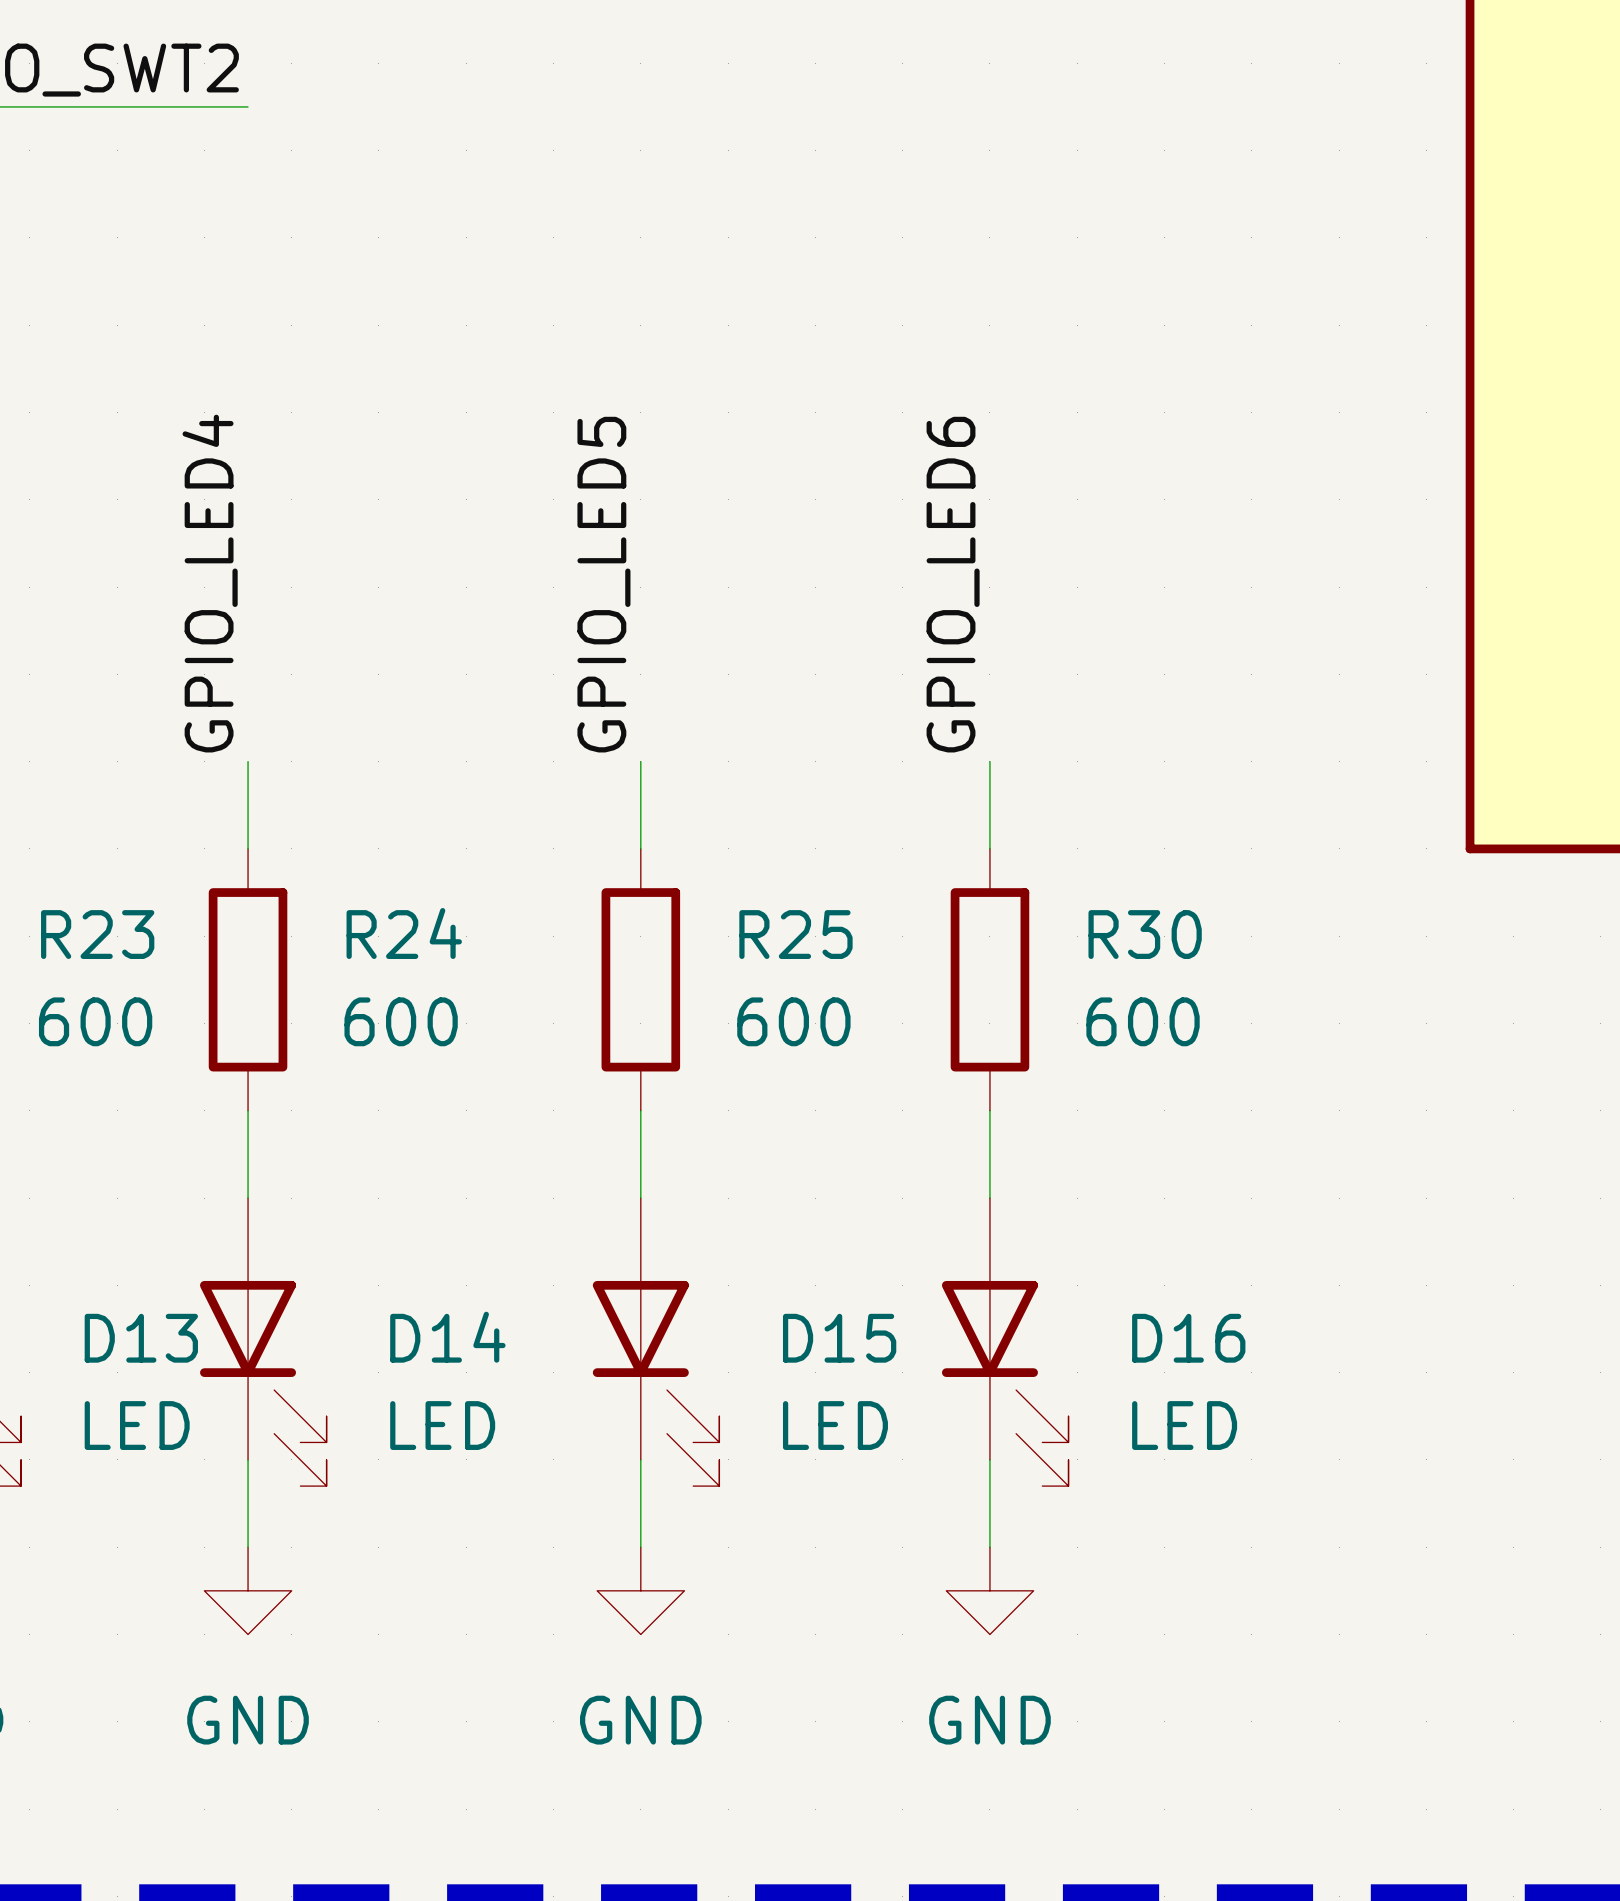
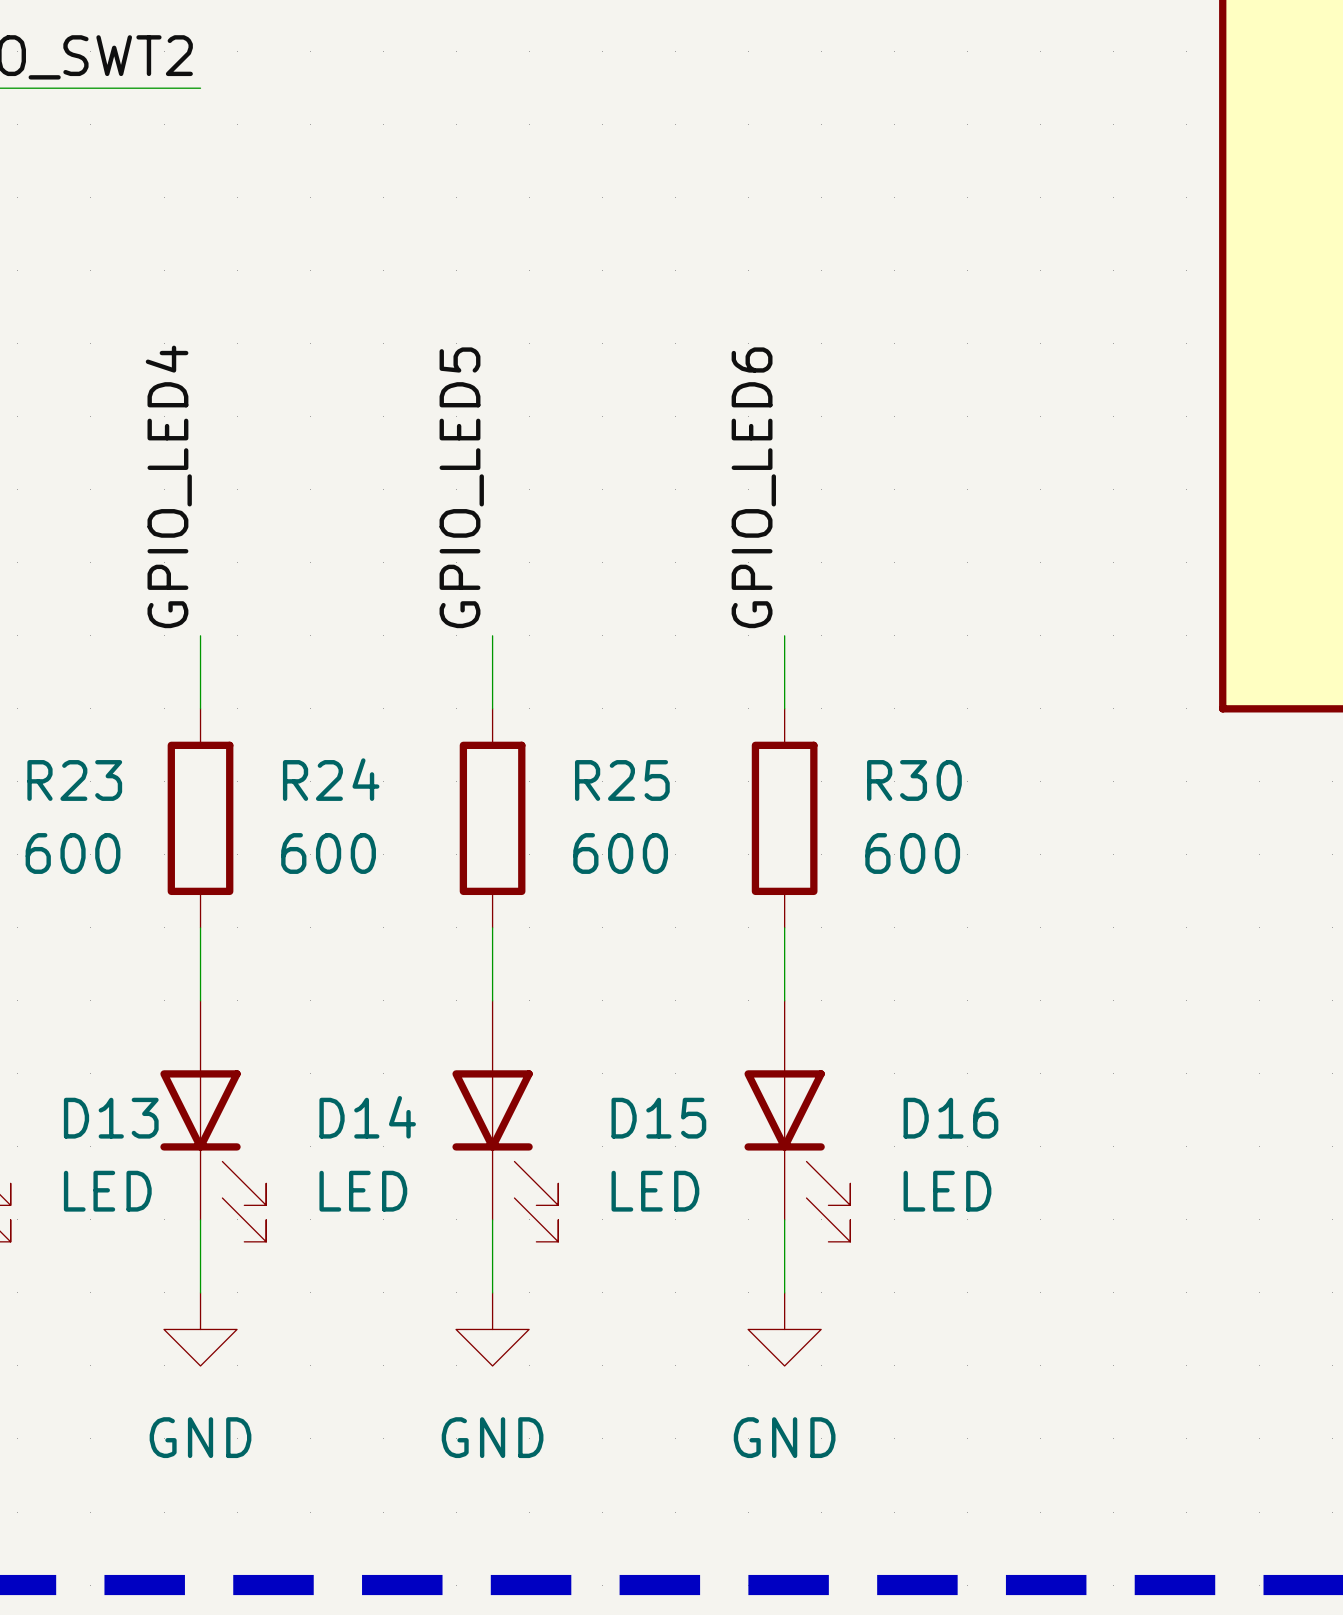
label position: GPIO_LED5 (603, 584) -> GPIO_LED5 (461, 487)
label position: GPIO_LED6 (953, 584) -> GPIO_LED6 (753, 487)
wire: (640, 761) (640, 848) -> (492, 635) (492, 708)
wire: (989, 761) (989, 848) -> (784, 635) (784, 708)
R25 position: (640, 979) -> (492, 818)
R30 position: (989, 979) -> (784, 818)
wire: (640, 1110) (640, 1198) -> (492, 927) (492, 1000)
wire: (989, 1110) (989, 1198) -> (784, 927) (784, 1000)
D15 position: (656, 1342) -> (505, 1121)
D16 position: (1005, 1342) -> (797, 1121)
wire: (640, 1459) (640, 1547) -> (492, 1219) (492, 1292)
wire: (989, 1459) (989, 1547) -> (784, 1219) (784, 1292)
power symbol position: GND (640, 1590) -> GND (492, 1329)
power symbol position: GND (989, 1590) -> GND (784, 1329)

